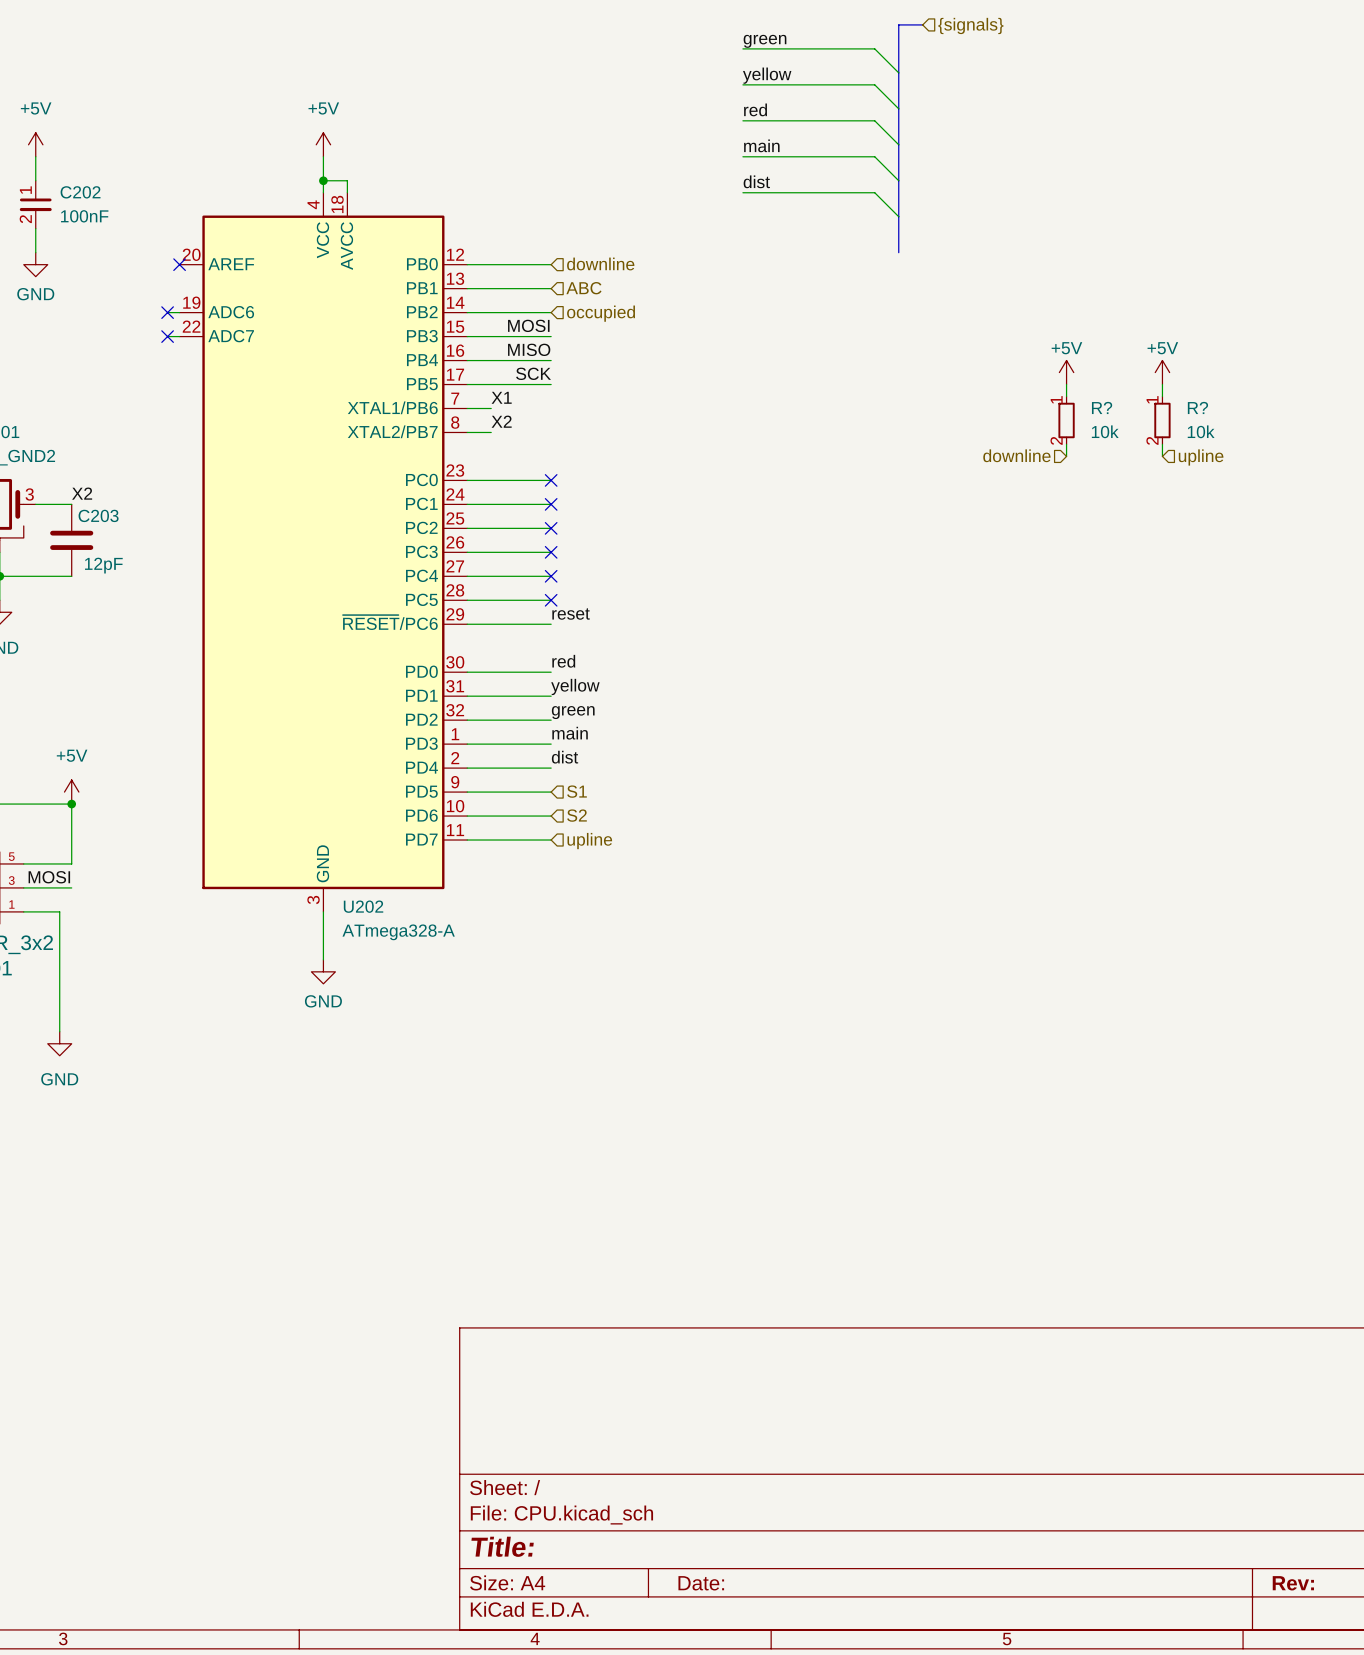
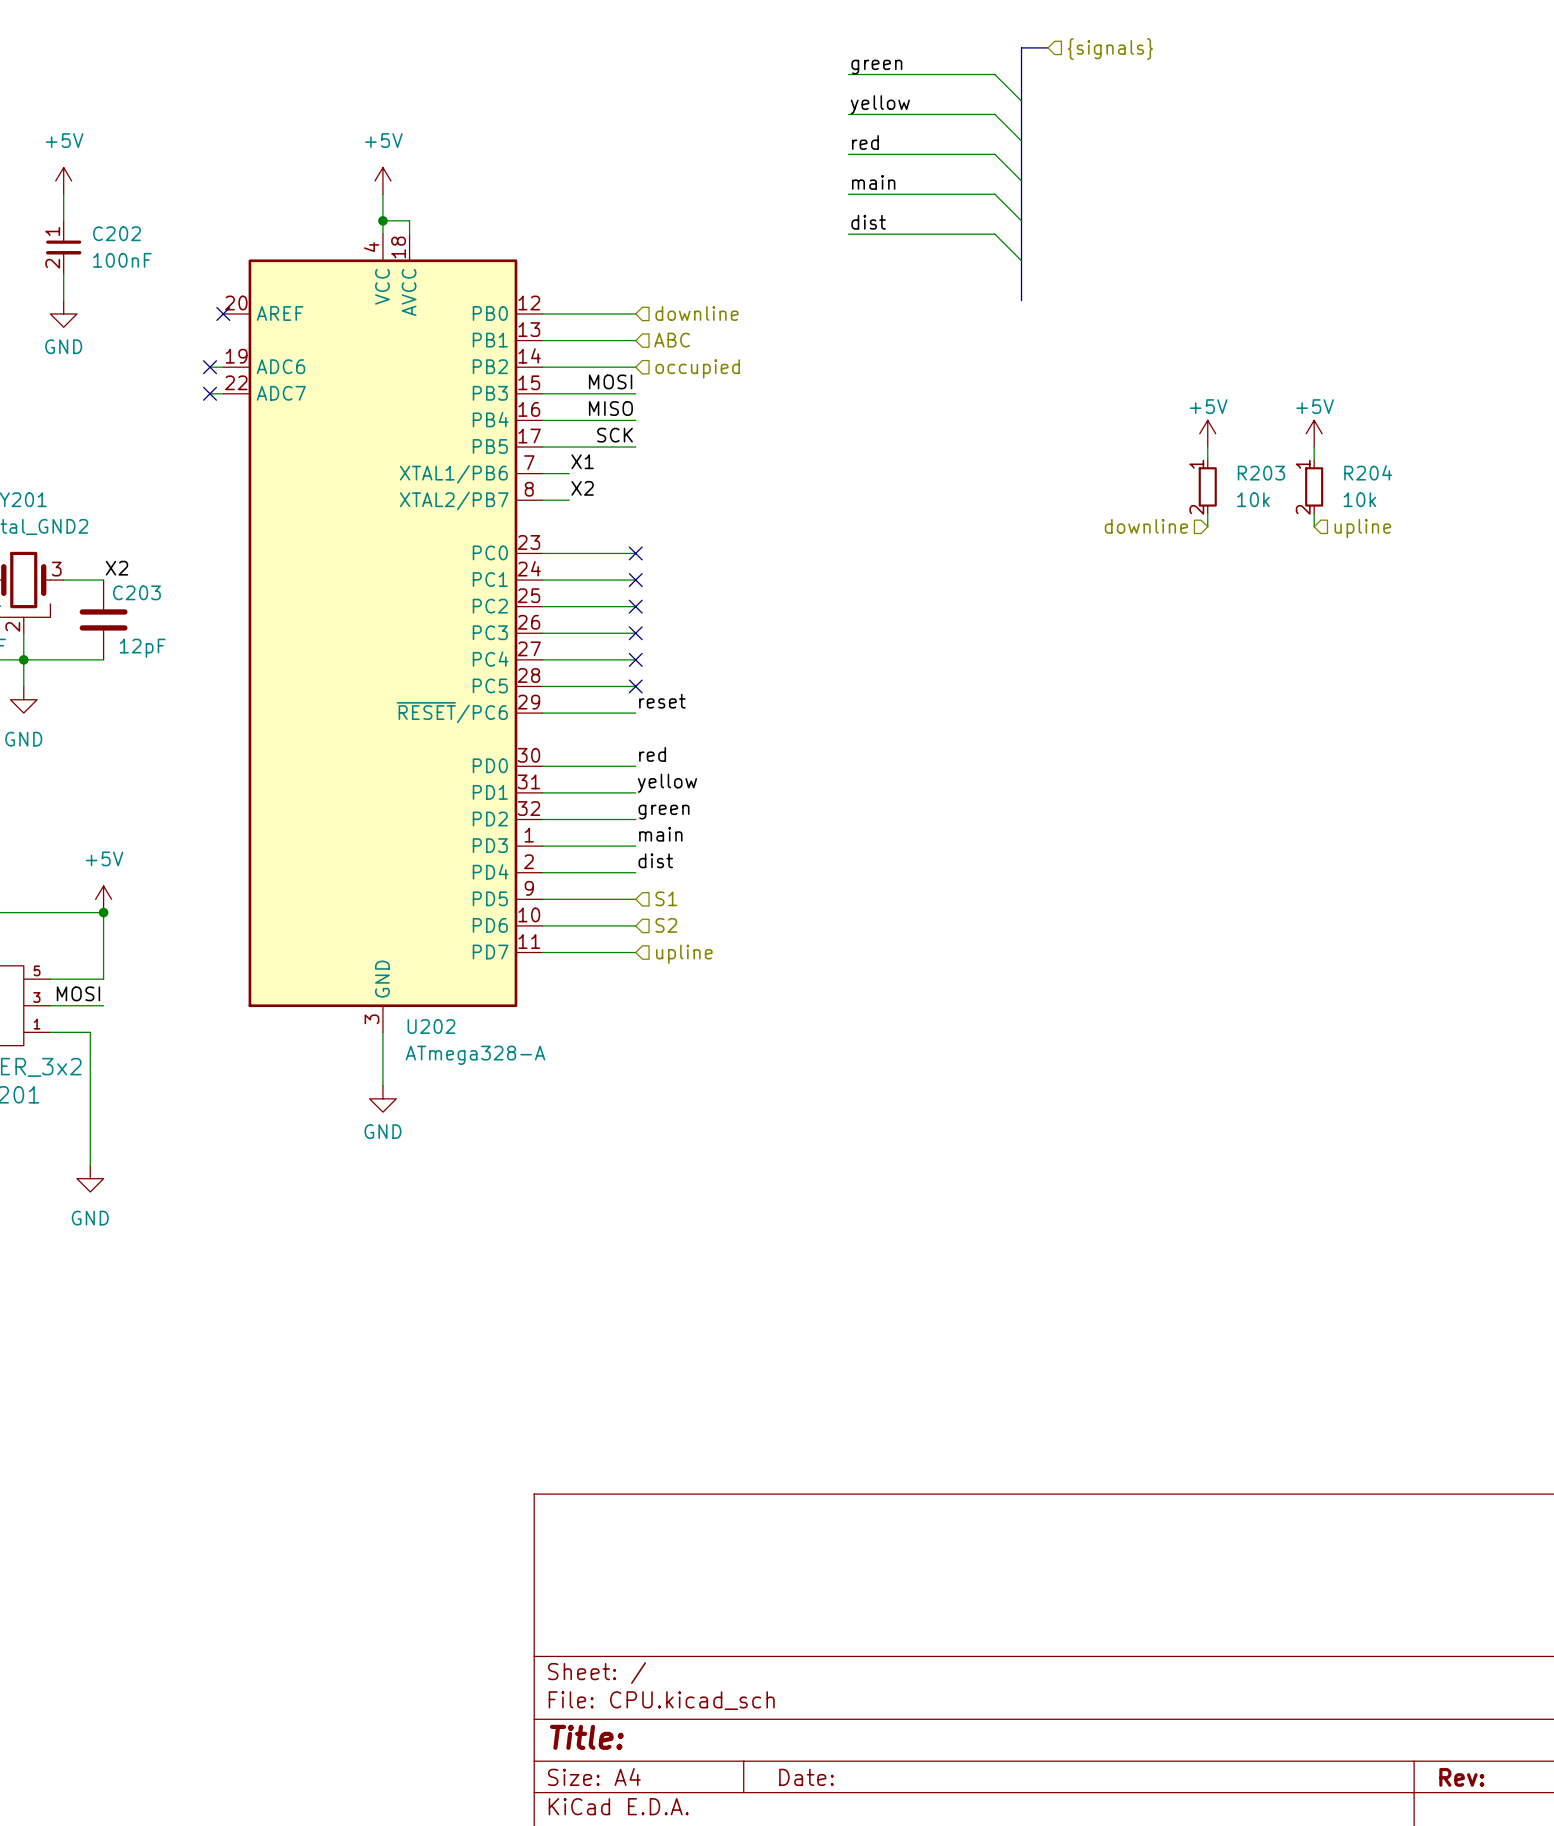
R? name: R? (1102, 407) -> R203 (1261, 473)
R? name: R? (1197, 407) -> R204 (1368, 472)

